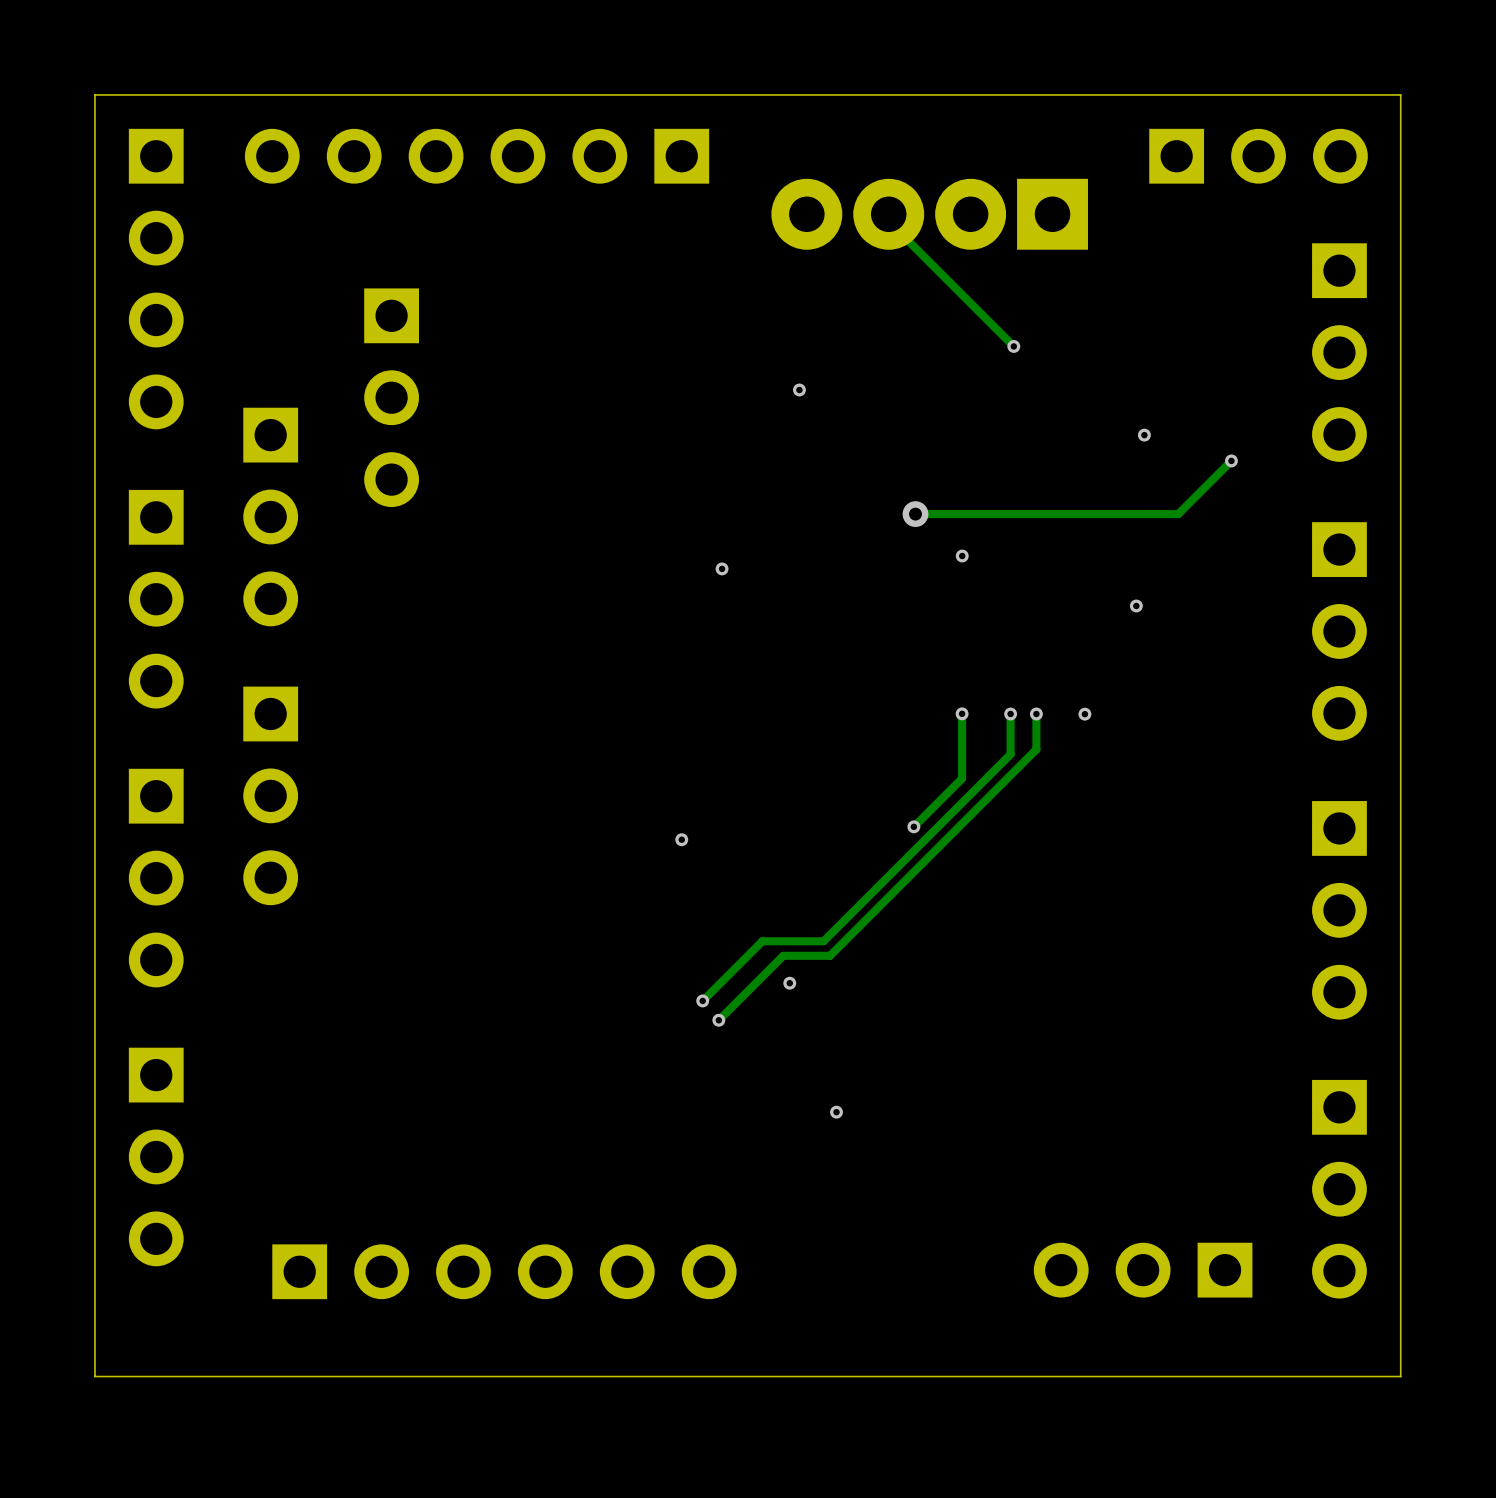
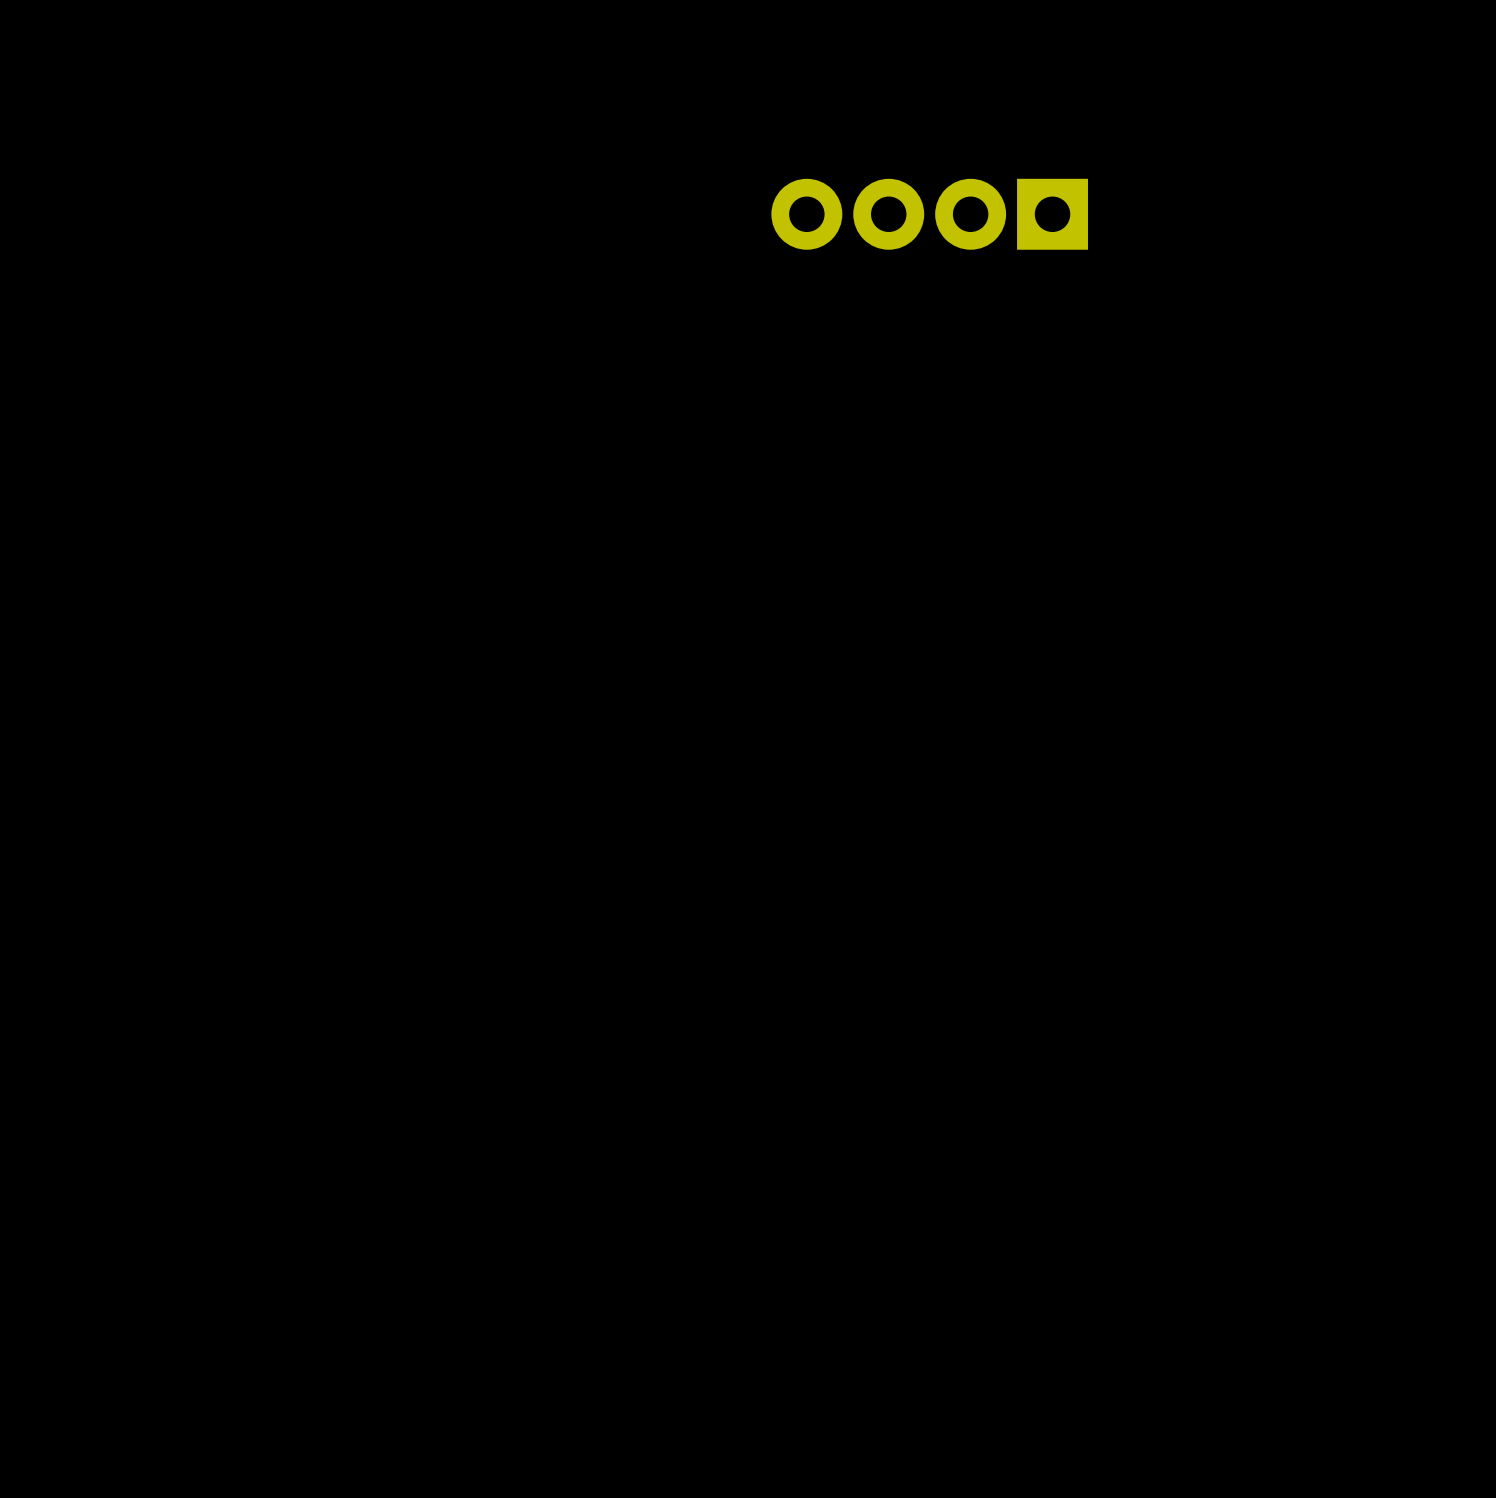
board edge: (1400, 94) (94, 94) (94, 1376) (1400, 1376) (1400, 94) -> none
part: (477, 156) -> none
part: (1258, 156) -> none
track: (888, 214) (888, 221) (1013, 346) -> none
part: (156, 279) -> none
via: (1013, 346) -> none
part: (1339, 352) -> none
via: (799, 389) -> none
part: (391, 397) -> none
via: (1144, 435) -> none
track: (1231, 460) (1178, 514) (915, 514) -> none
via: (1231, 460) -> none
via: (915, 514) -> none
part: (270, 517) -> none
via: (962, 556) -> none
via: (722, 568) -> none
part: (156, 599) -> none
via: (1136, 605) -> none
part: (1339, 631) -> none
track: (962, 713) (962, 778) (913, 826) -> none
via: (962, 713) -> none
track: (1010, 713) (1010, 754) (823, 941) (762, 941) (702, 1000) -> none
via: (1010, 713) -> none
track: (1036, 713) (1036, 749) (830, 955) (783, 955) (718, 1020) -> none
via: (1036, 713) -> none
via: (1084, 714) -> none
part: (270, 795) -> none
via: (913, 826) -> none
via: (681, 839) -> none
part: (156, 878) -> none
part: (1339, 910) -> none
via: (789, 983) -> none
via: (702, 1000) -> none
via: (718, 1020) -> none
via: (836, 1112) -> none
part: (156, 1156) -> none
part: (1339, 1189) -> none
part: (1143, 1270) -> none
part: (504, 1271) -> none

